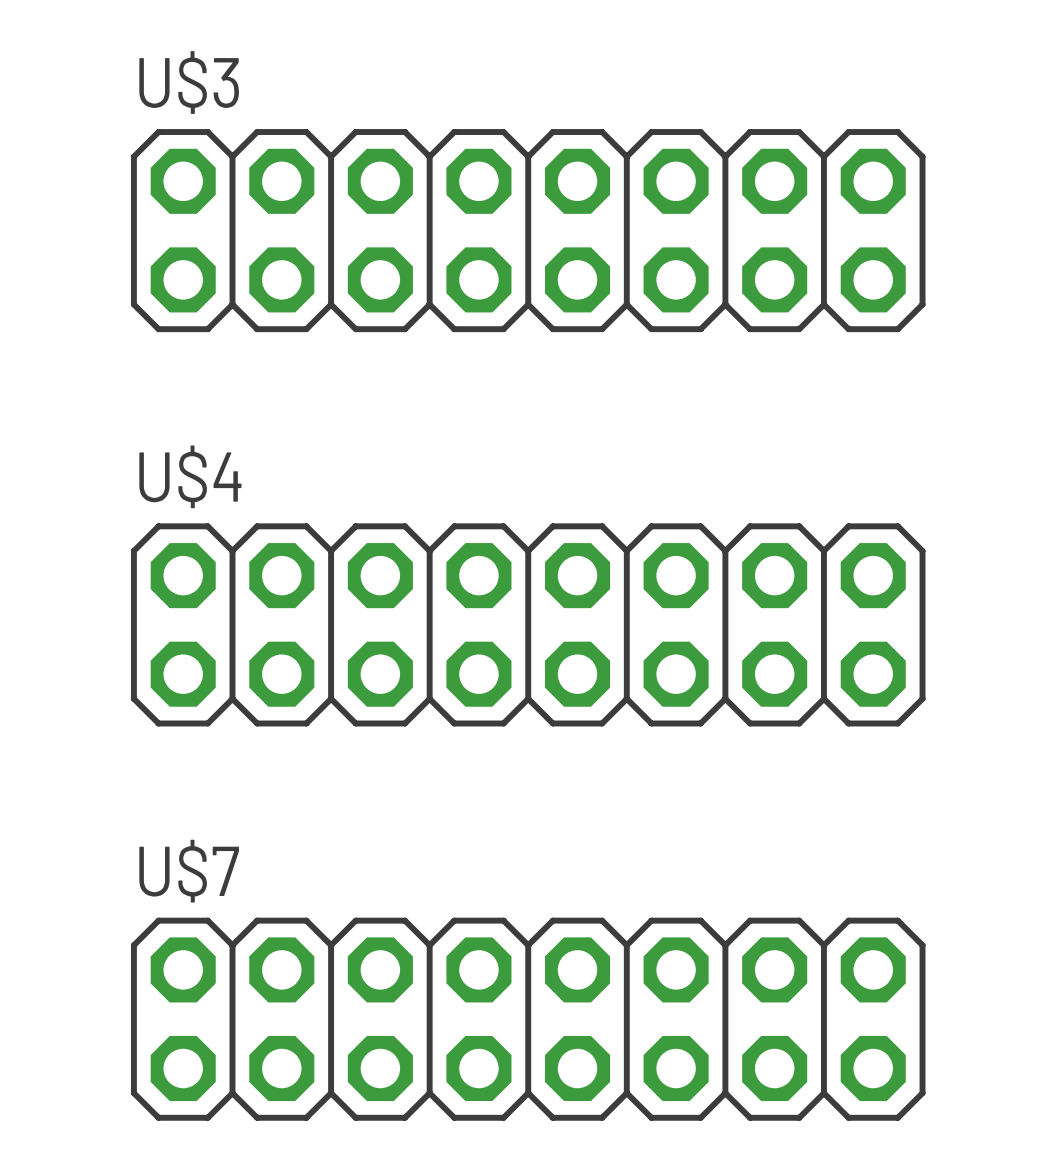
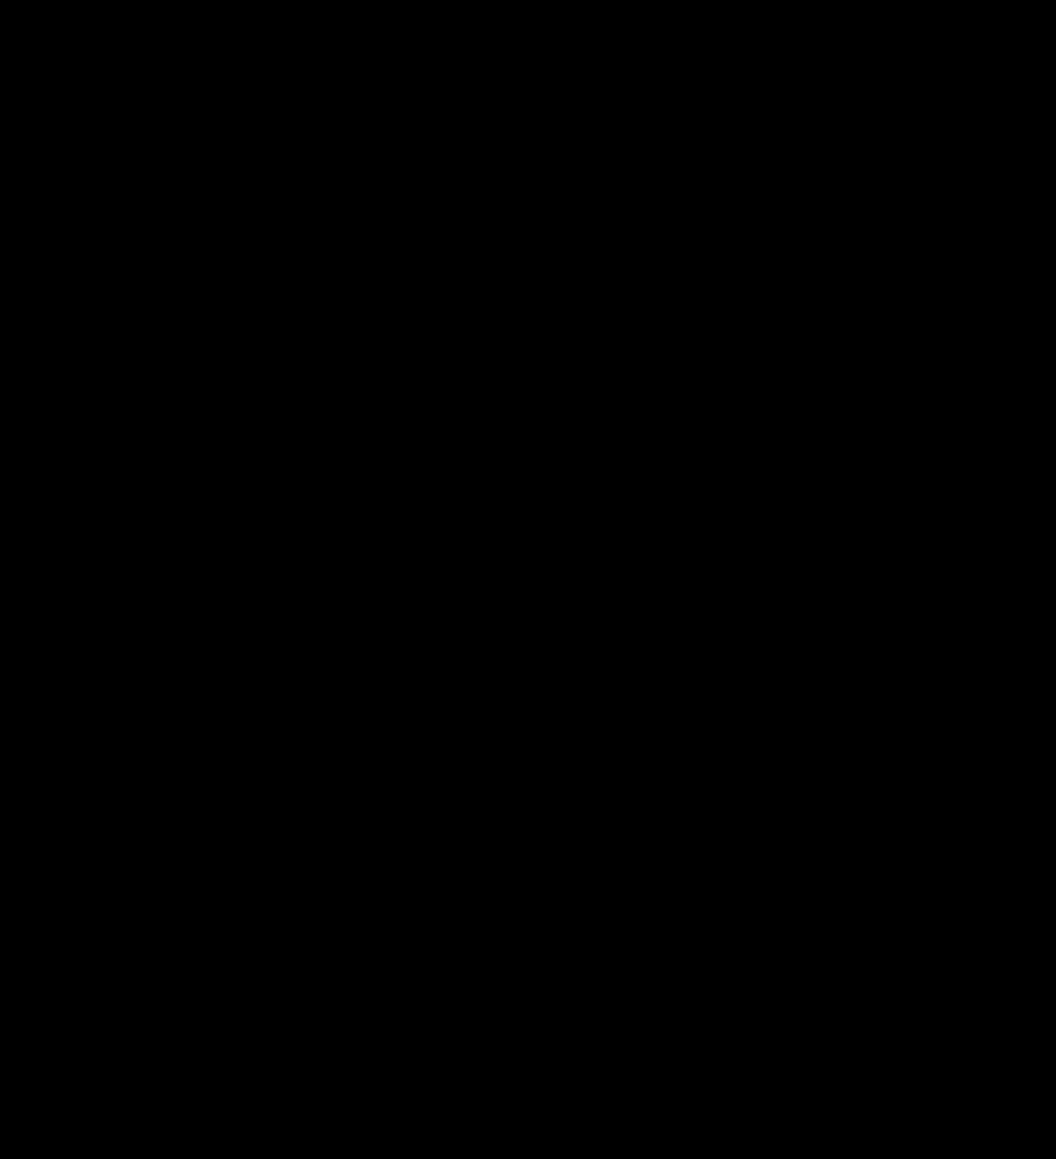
U$3: (528, 230) -> none
U$4: (528, 624) -> none
U$7: (528, 1019) -> none

